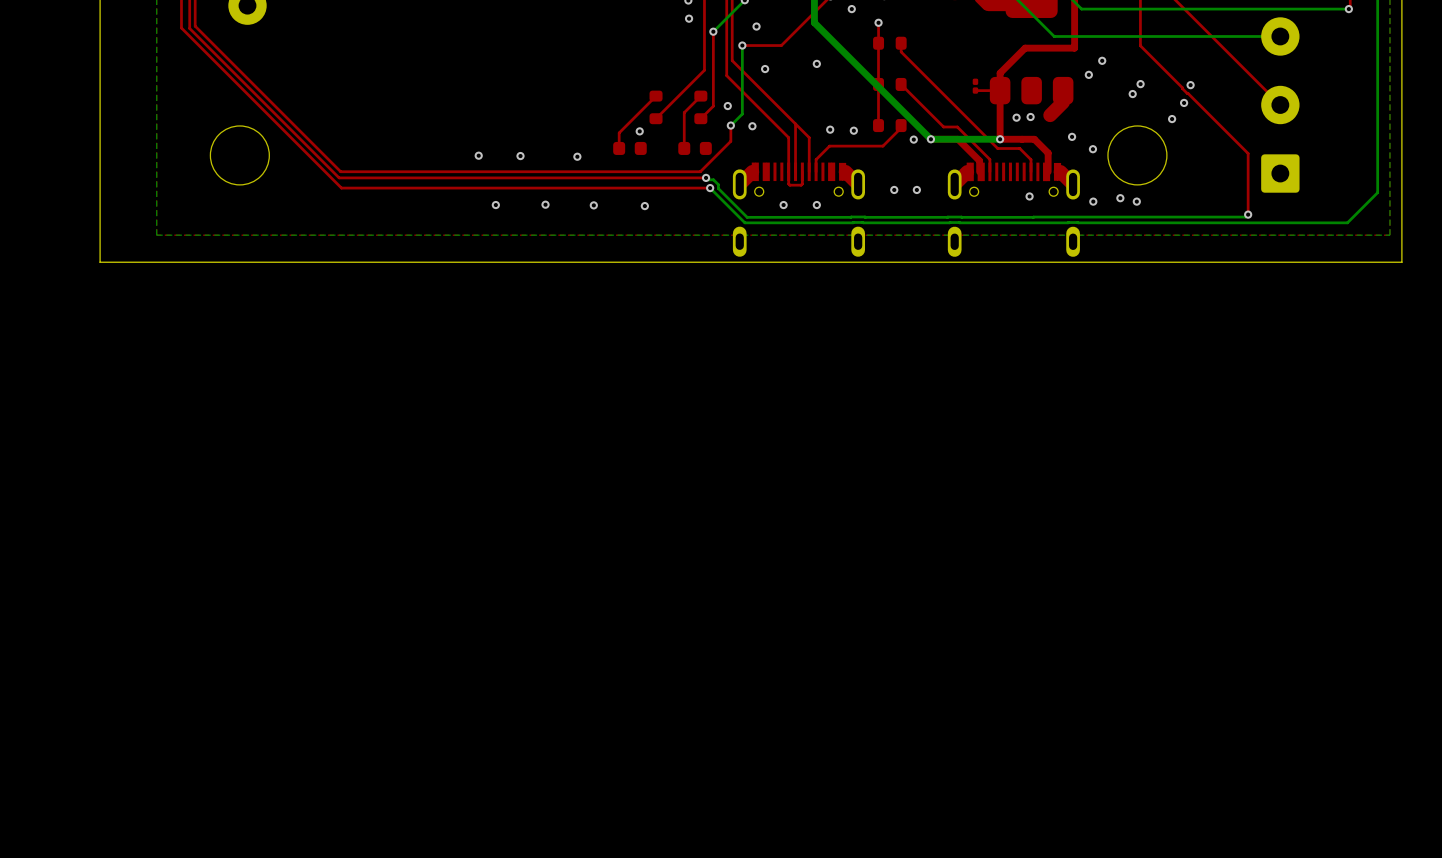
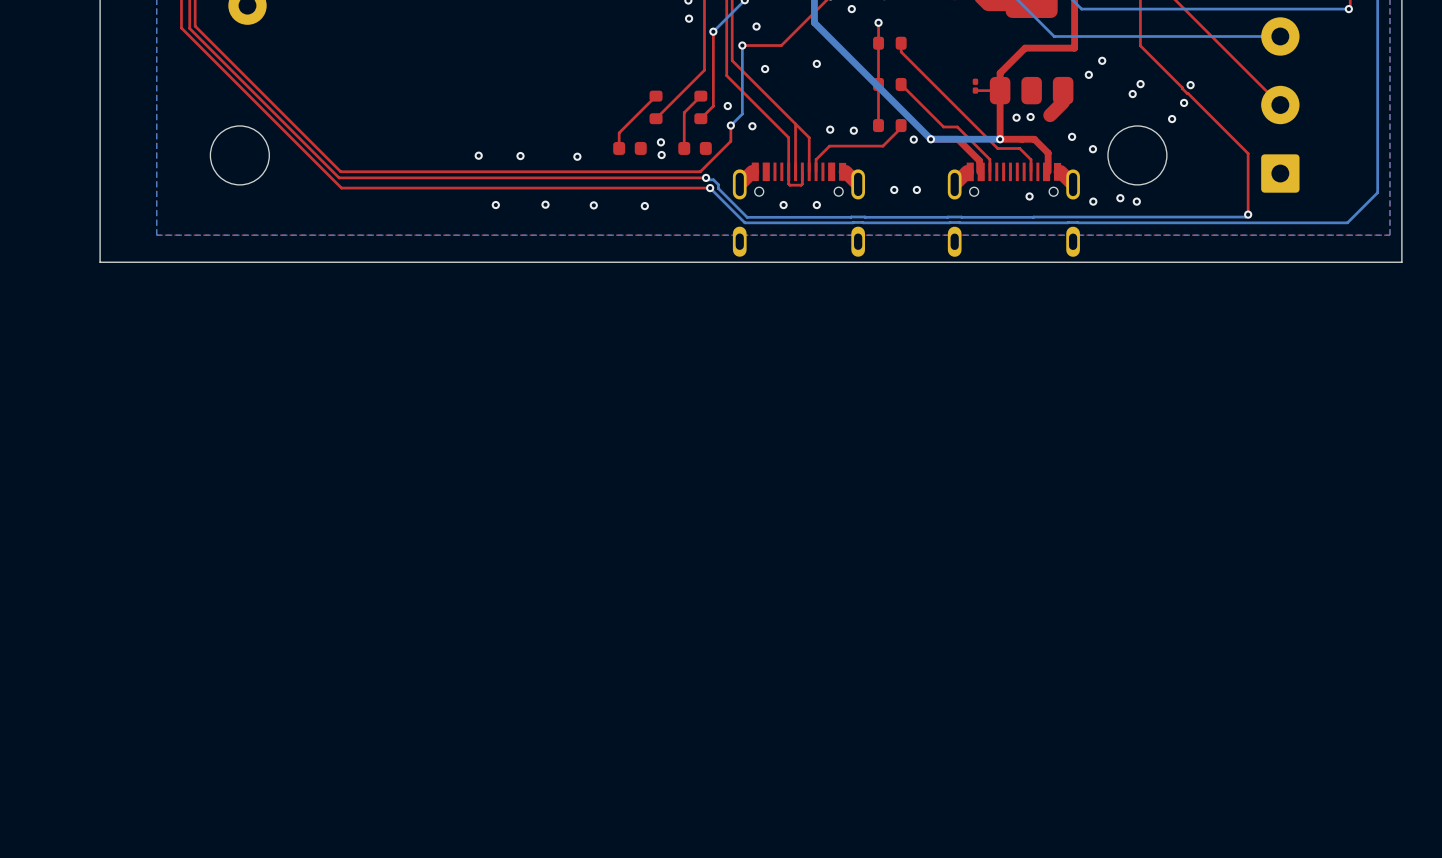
via: (639, 131) -> none
via: none -> (660, 142)
via: none -> (661, 155)

